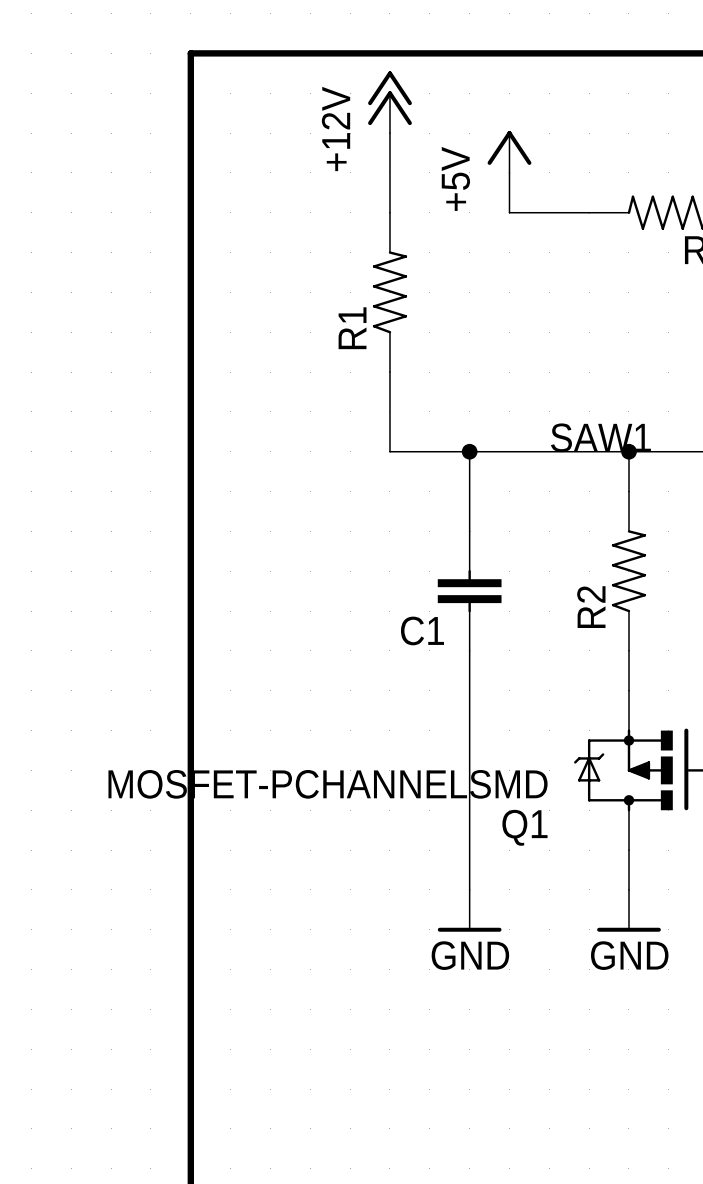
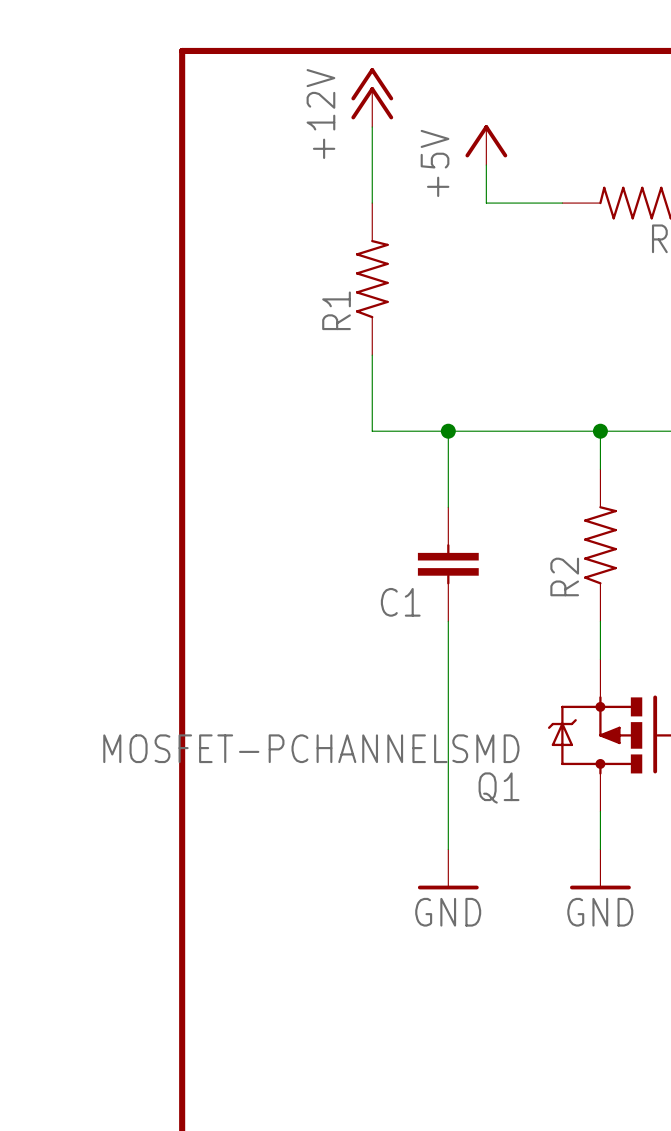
label: SAW1 (600, 437) -> none

